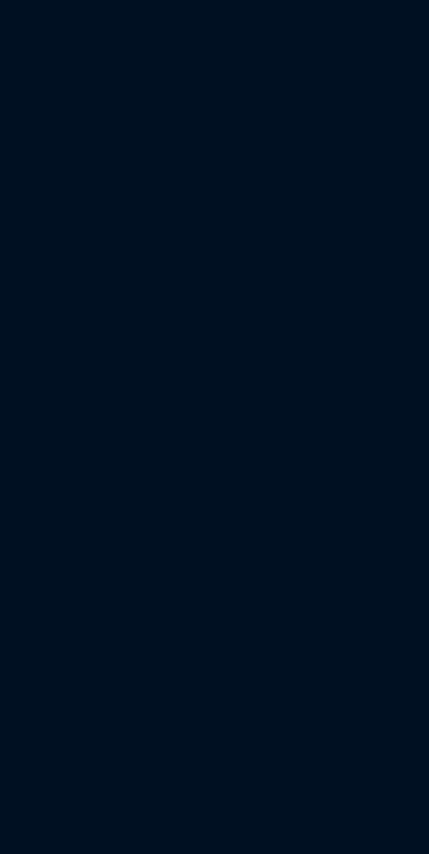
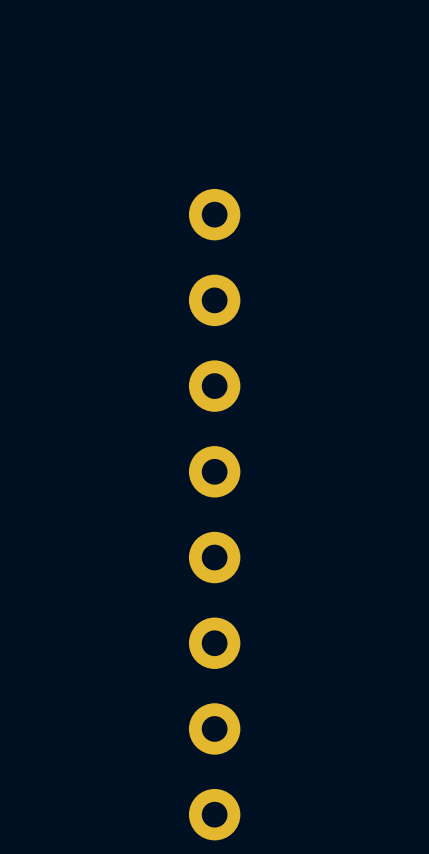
part: none -> (214, 514)

